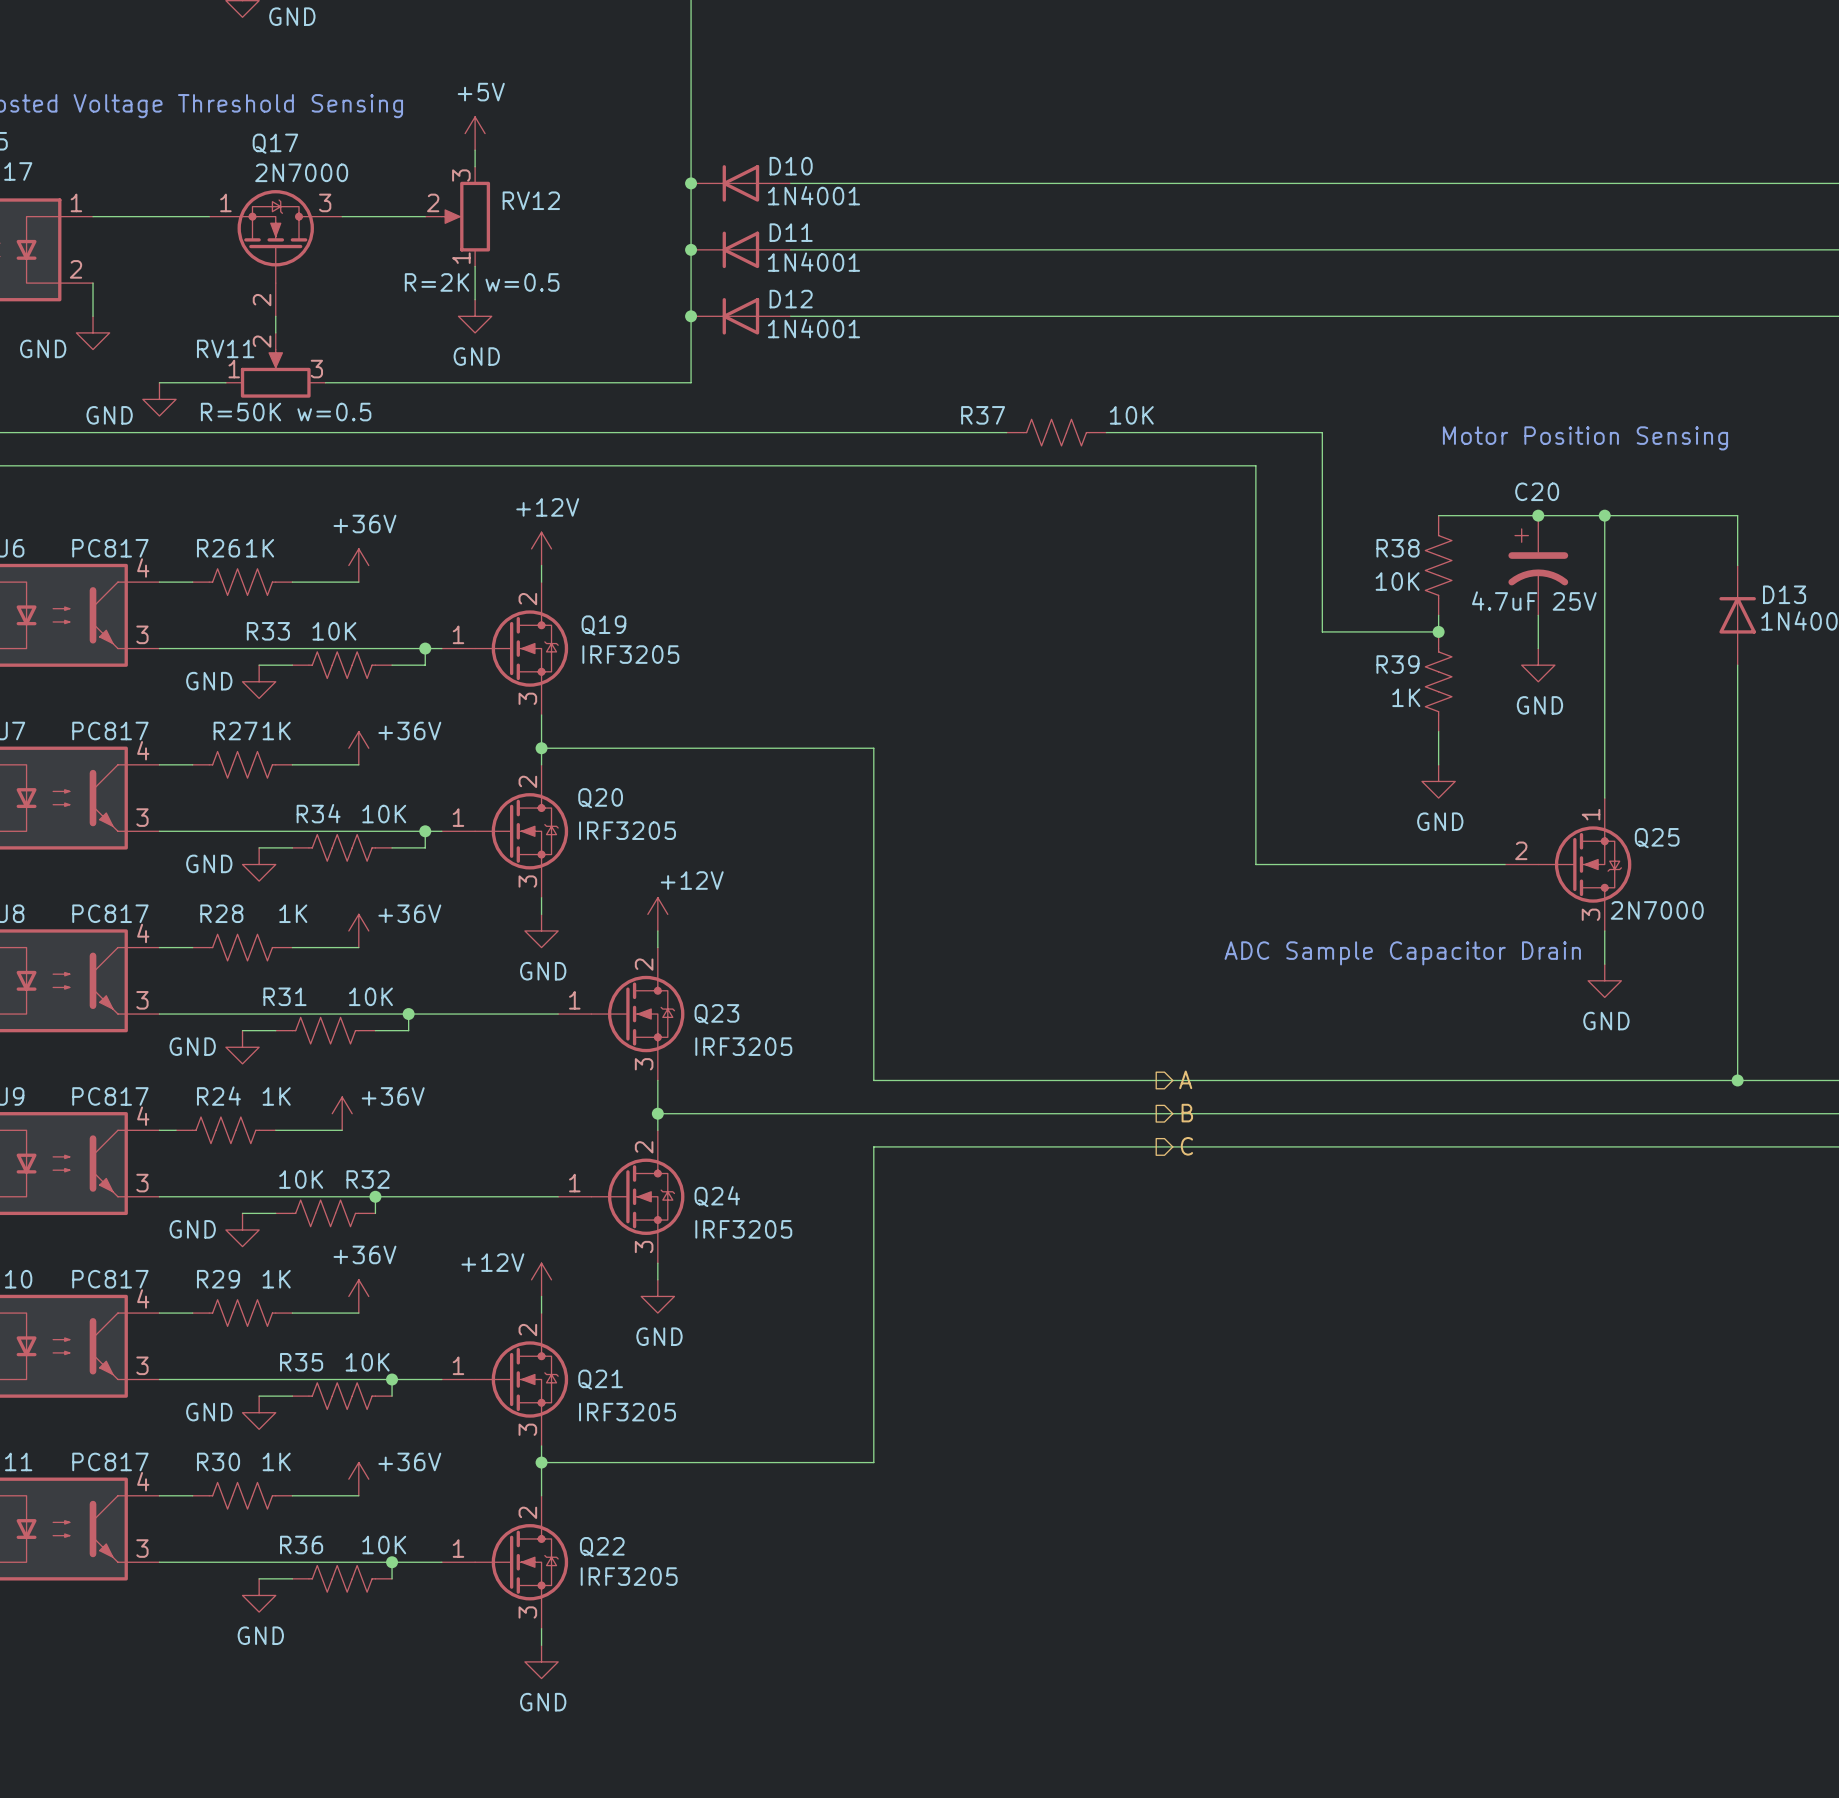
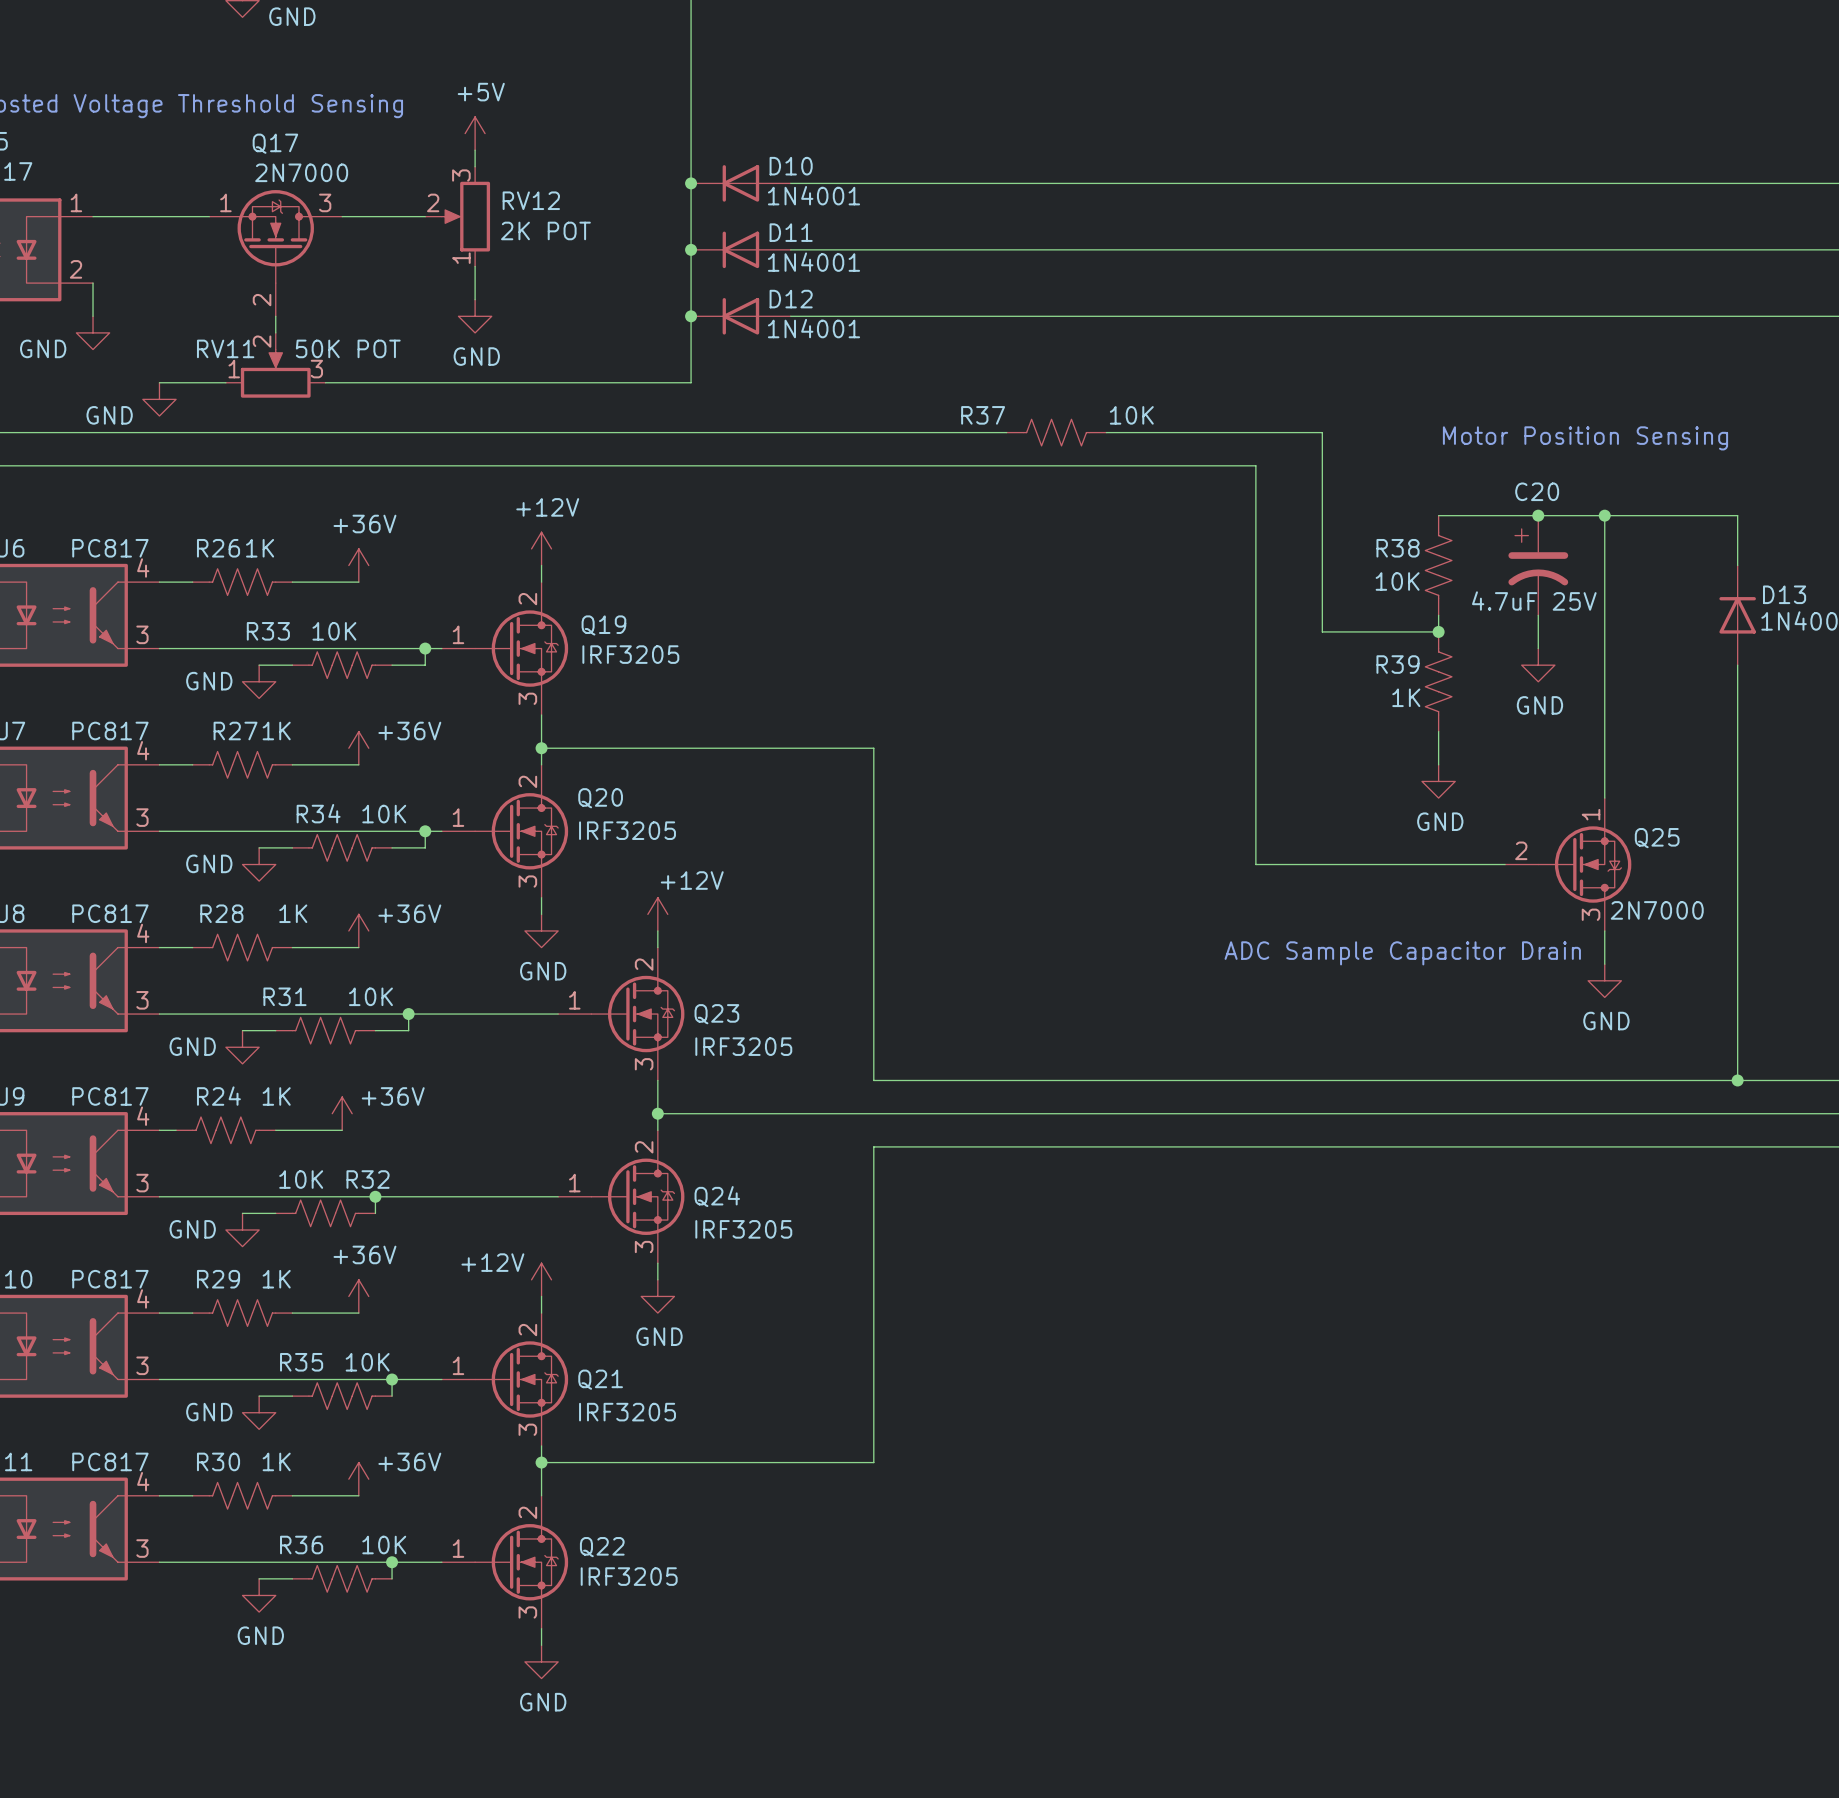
RV12 value: none -> 2K POT (545, 230)
RV12 text: R=2K w=0.5 (482, 282) -> none
RV11 value: none -> 50K POT (348, 348)
RV11 text: R=50K w=0.5 (286, 412) -> none
hierarchical label: A (1185, 1079) -> none
hierarchical label: B (1187, 1113) -> none
hierarchical label: C (1186, 1146) -> none

